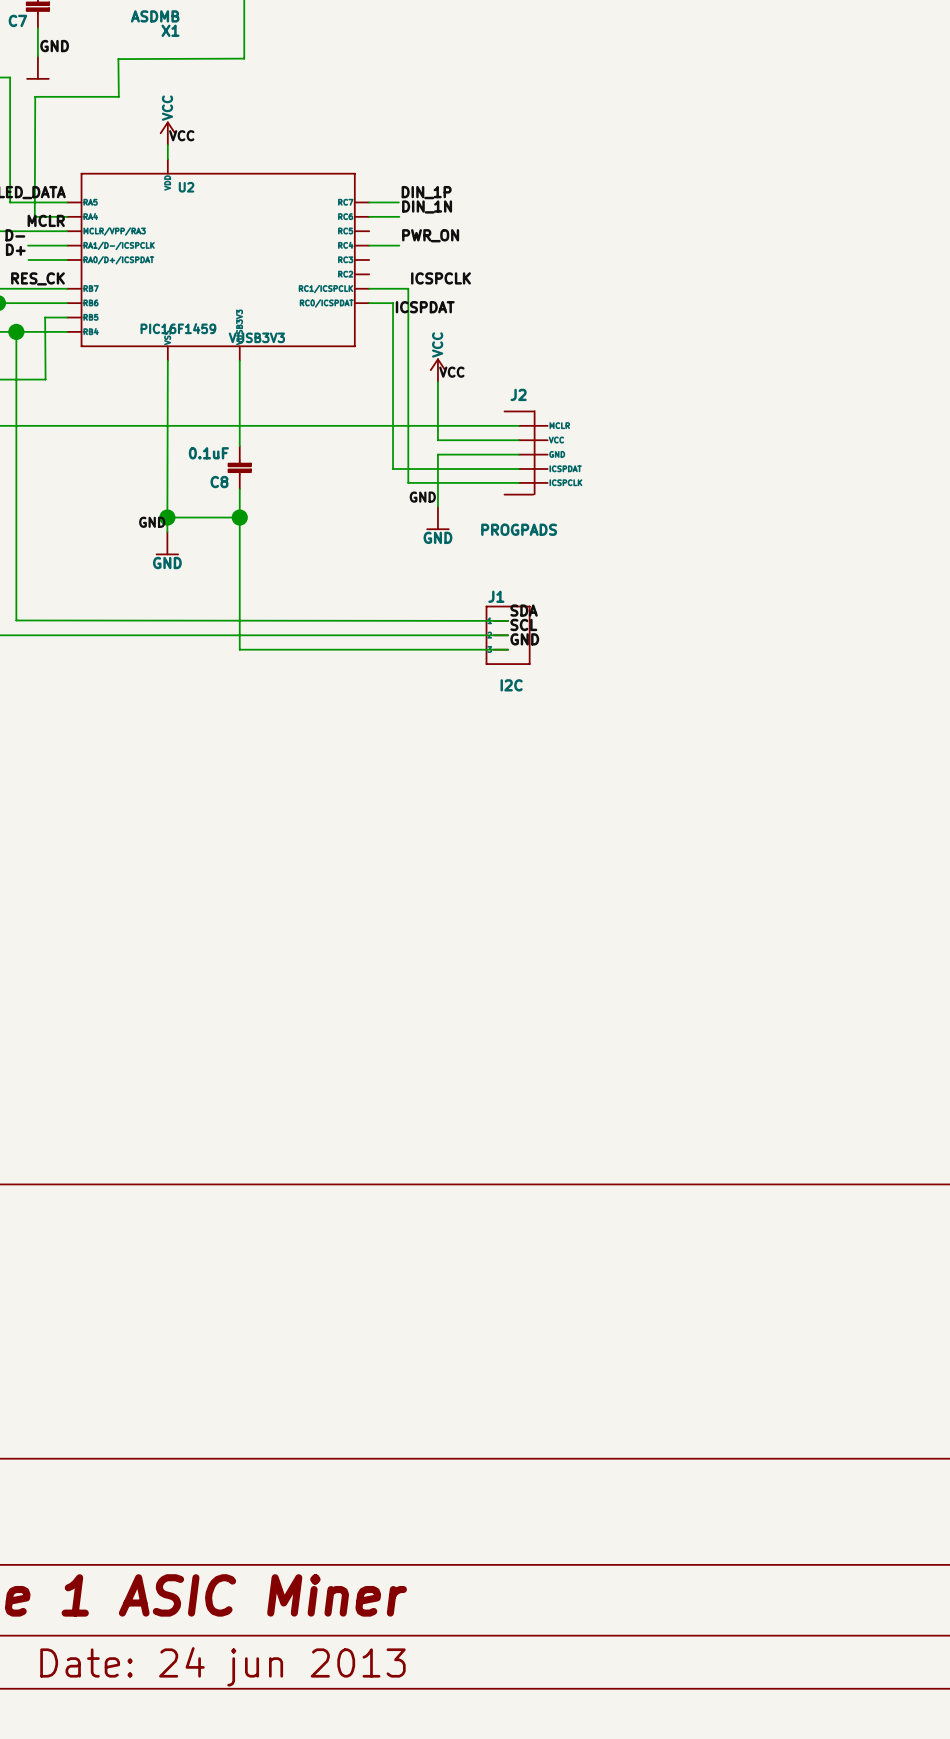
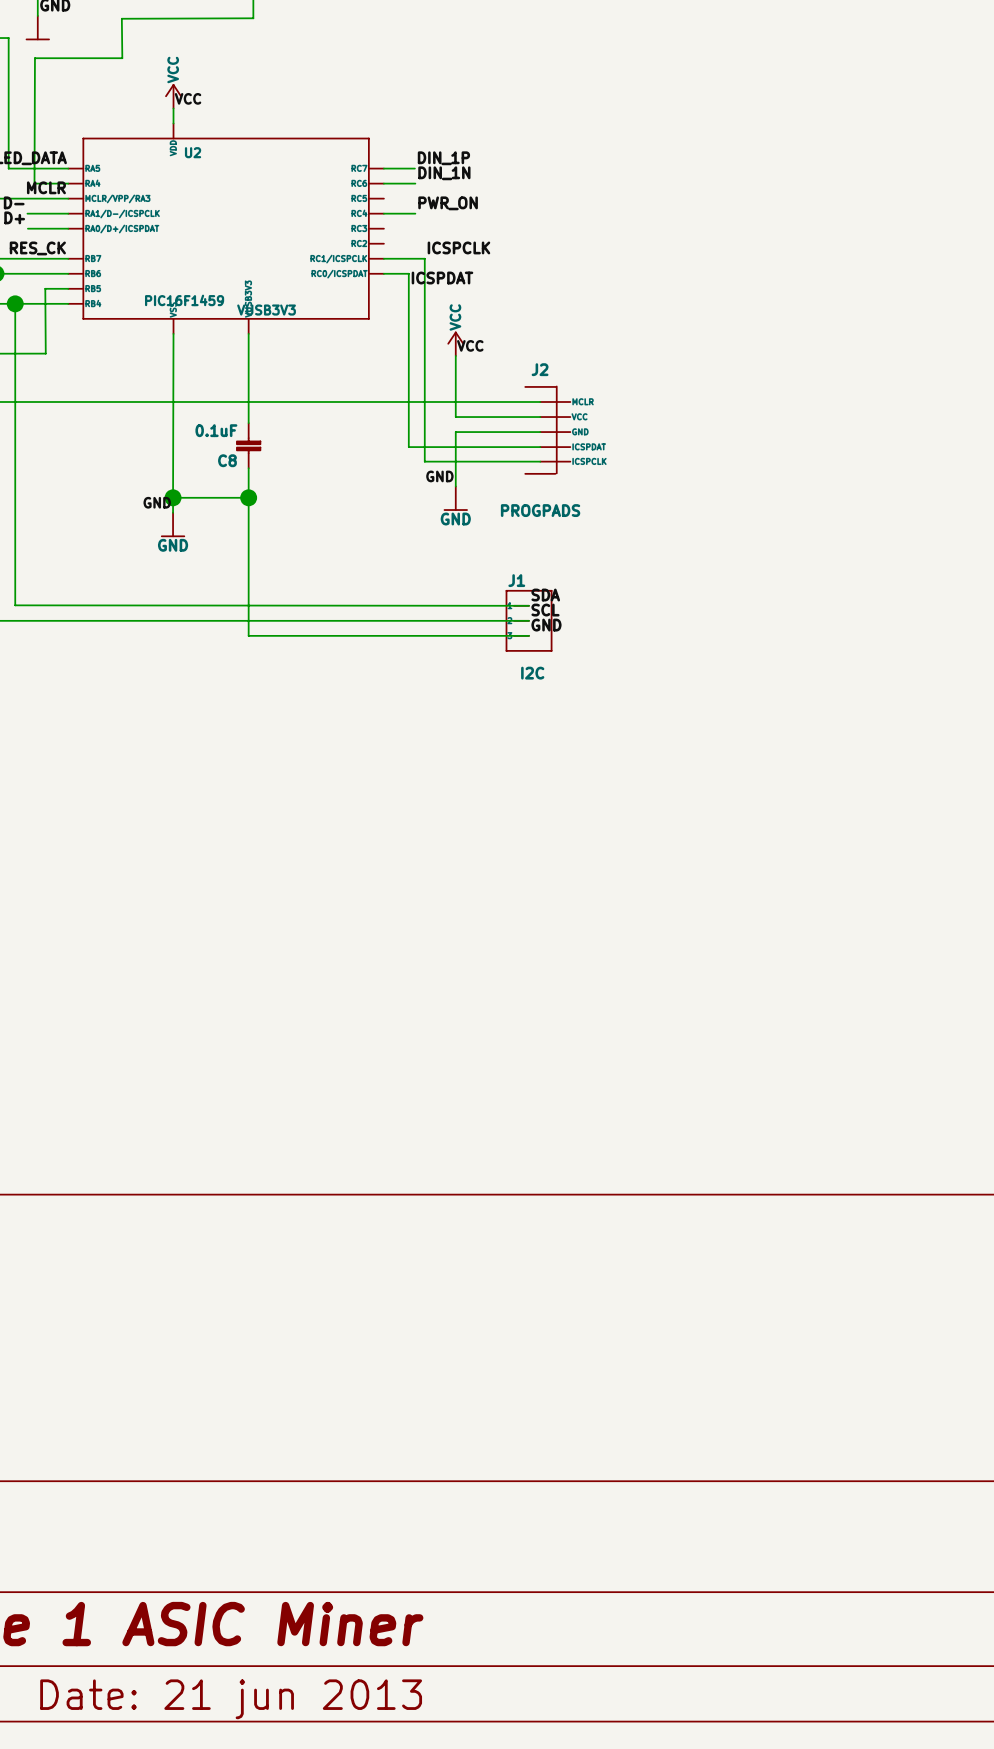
title block: Date: 24 jun 2013 (222, 1666) -> Date: 21 jun 2013 (231, 1699)

